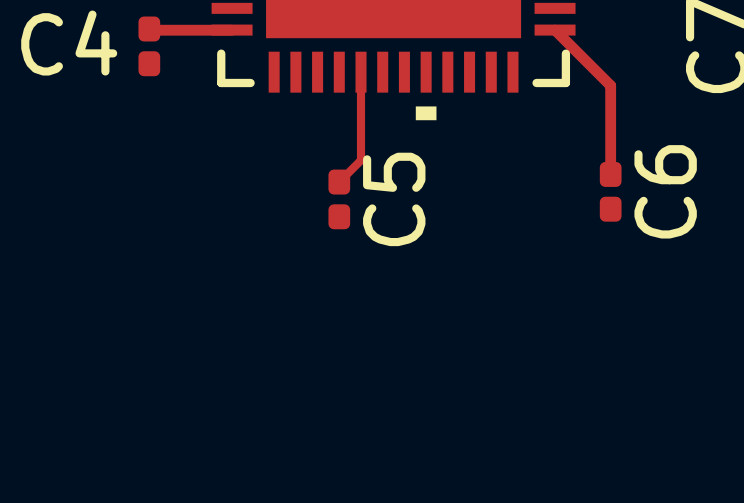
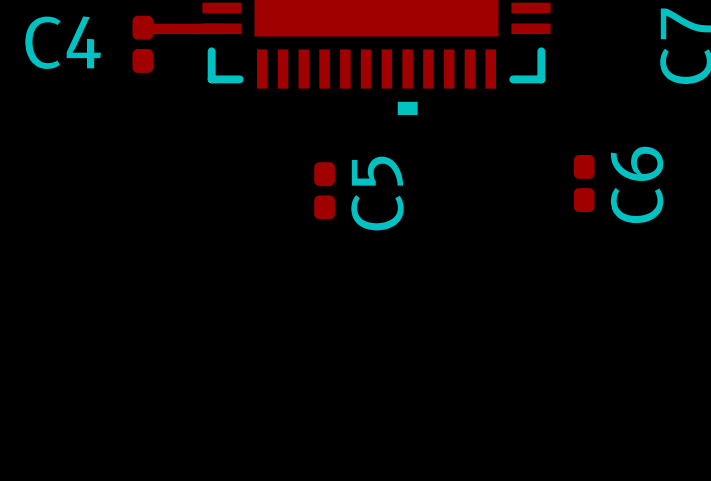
top track: (555, 30) (610, 85) (610, 174) -> none
top track: (361, 72) (361, 160) (339, 182) -> none

